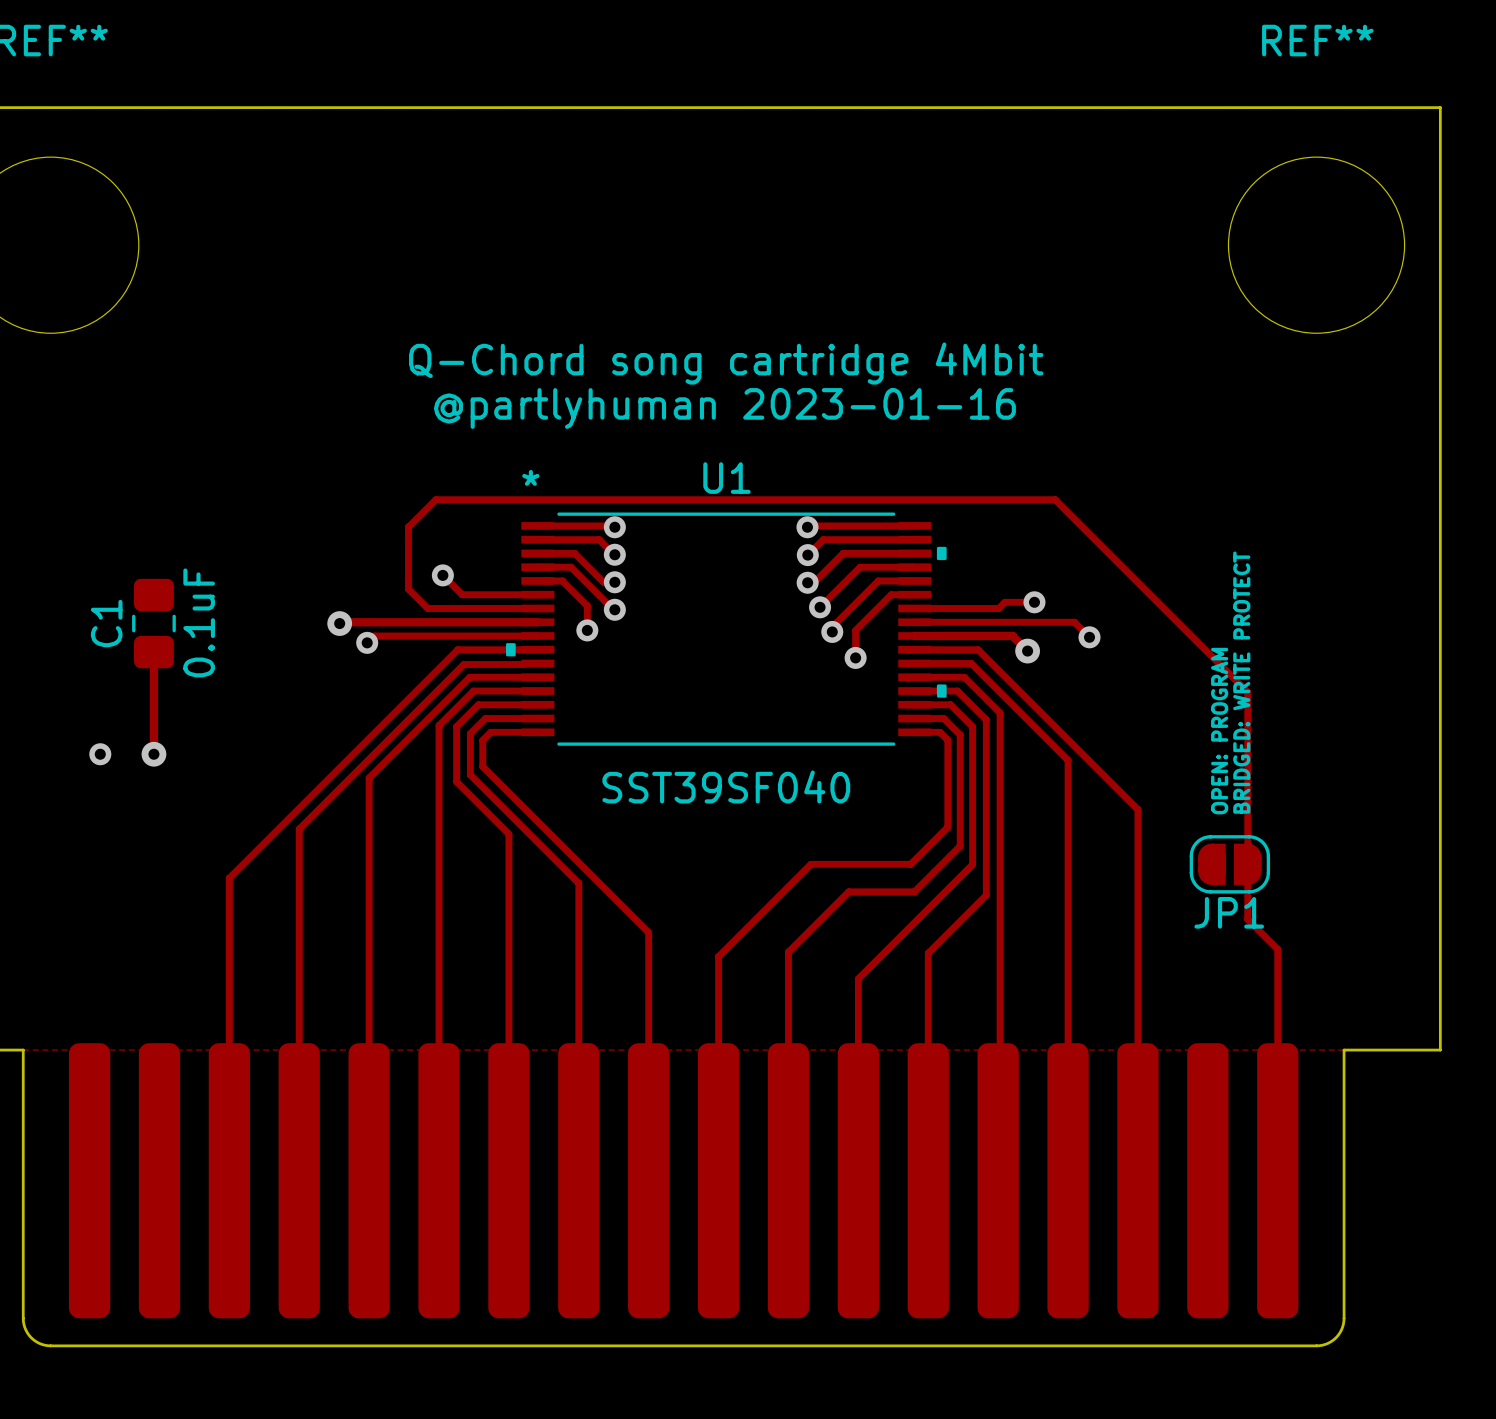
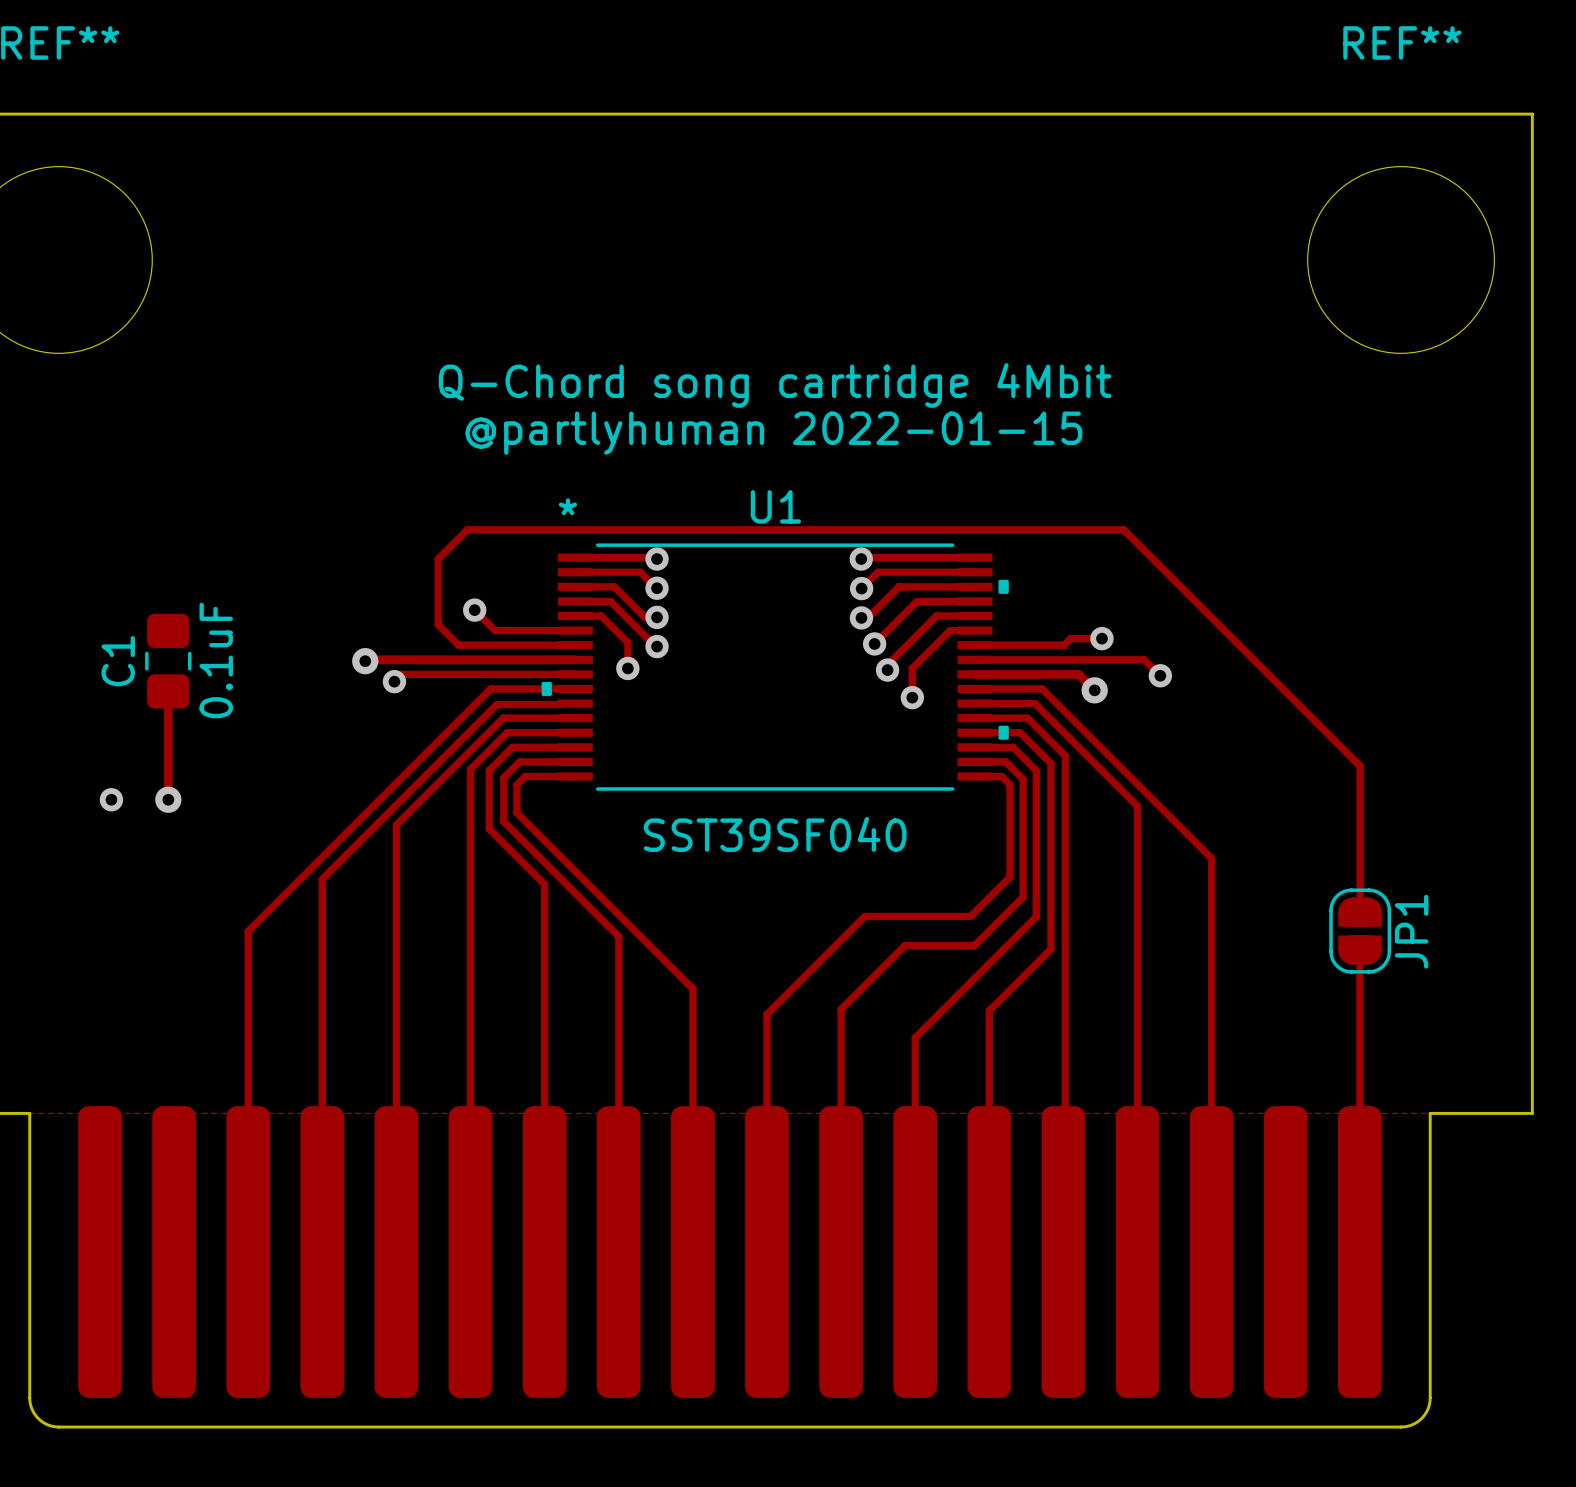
text: @partlyhuman 2023-01-16 (724, 408) -> @partlyhuman 2022-01-15 (773, 433)
text: BRIDGED: WRITE PROTECT (1241, 682) -> none
track: (1247, 692) (1247, 919) (1277, 949) -> (1328, 734) (1360, 766) (1360, 912)
text: OPEN: PROGRAM (1219, 731) -> none
JP1 rotation: 0° (1229, 864) -> 90° clockwise (1360, 931)
JP1 position: (1229, 864) -> (1360, 931)
track: none -> (1359, 950) (1359, 1006)
JP1 name position: JP1 (1229, 912) -> JP1 (1411, 931)

